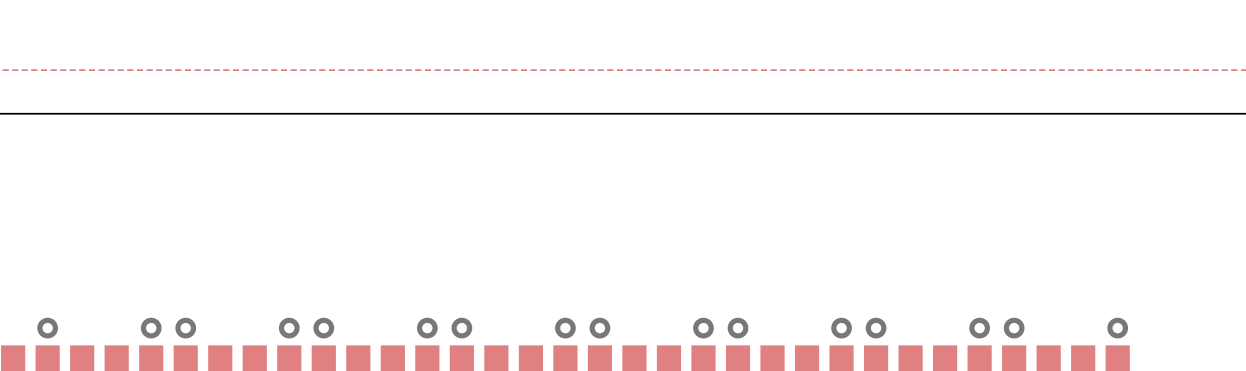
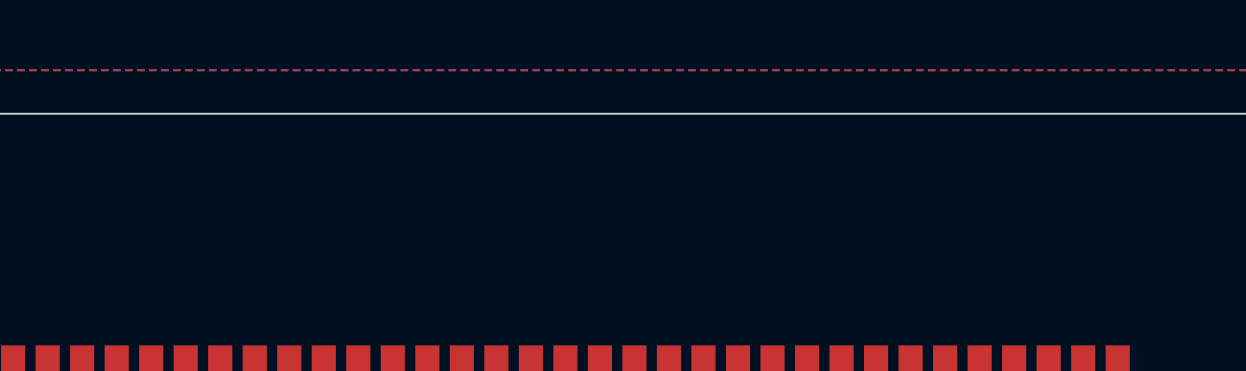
via: (47, 328) -> none
via: (151, 328) -> none
via: (185, 328) -> none
via: (289, 328) -> none
via: (323, 328) -> none
via: (427, 328) -> none
via: (461, 328) -> none
via: (565, 328) -> none
via: (599, 328) -> none
via: (703, 328) -> none
via: (738, 328) -> none
via: (841, 328) -> none
via: (876, 328) -> none
via: (979, 328) -> none
via: (1014, 328) -> none
via: (1117, 328) -> none

